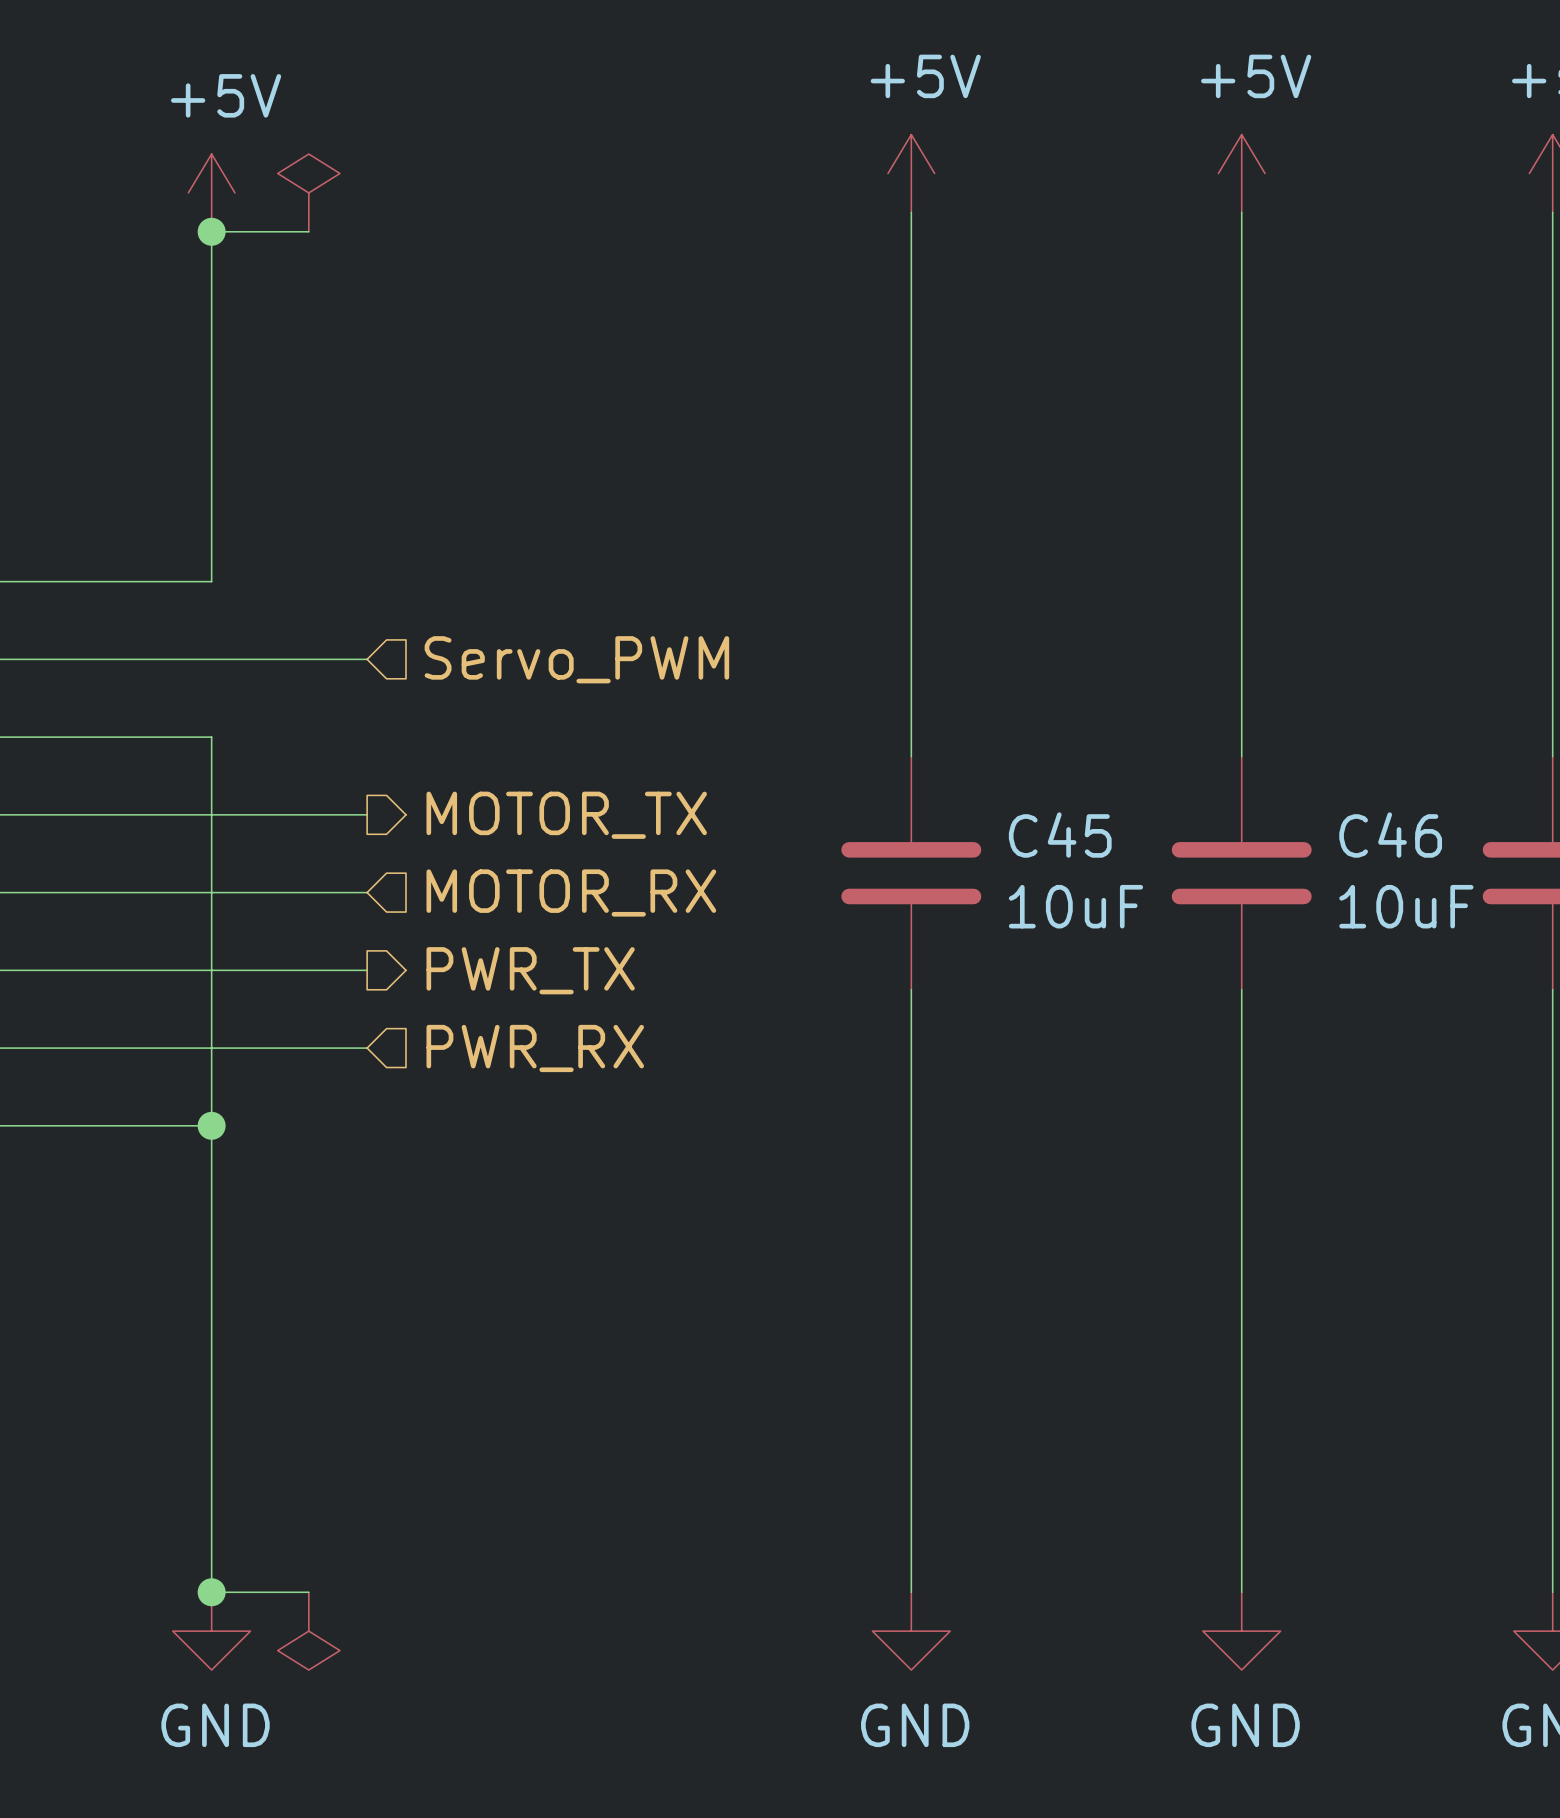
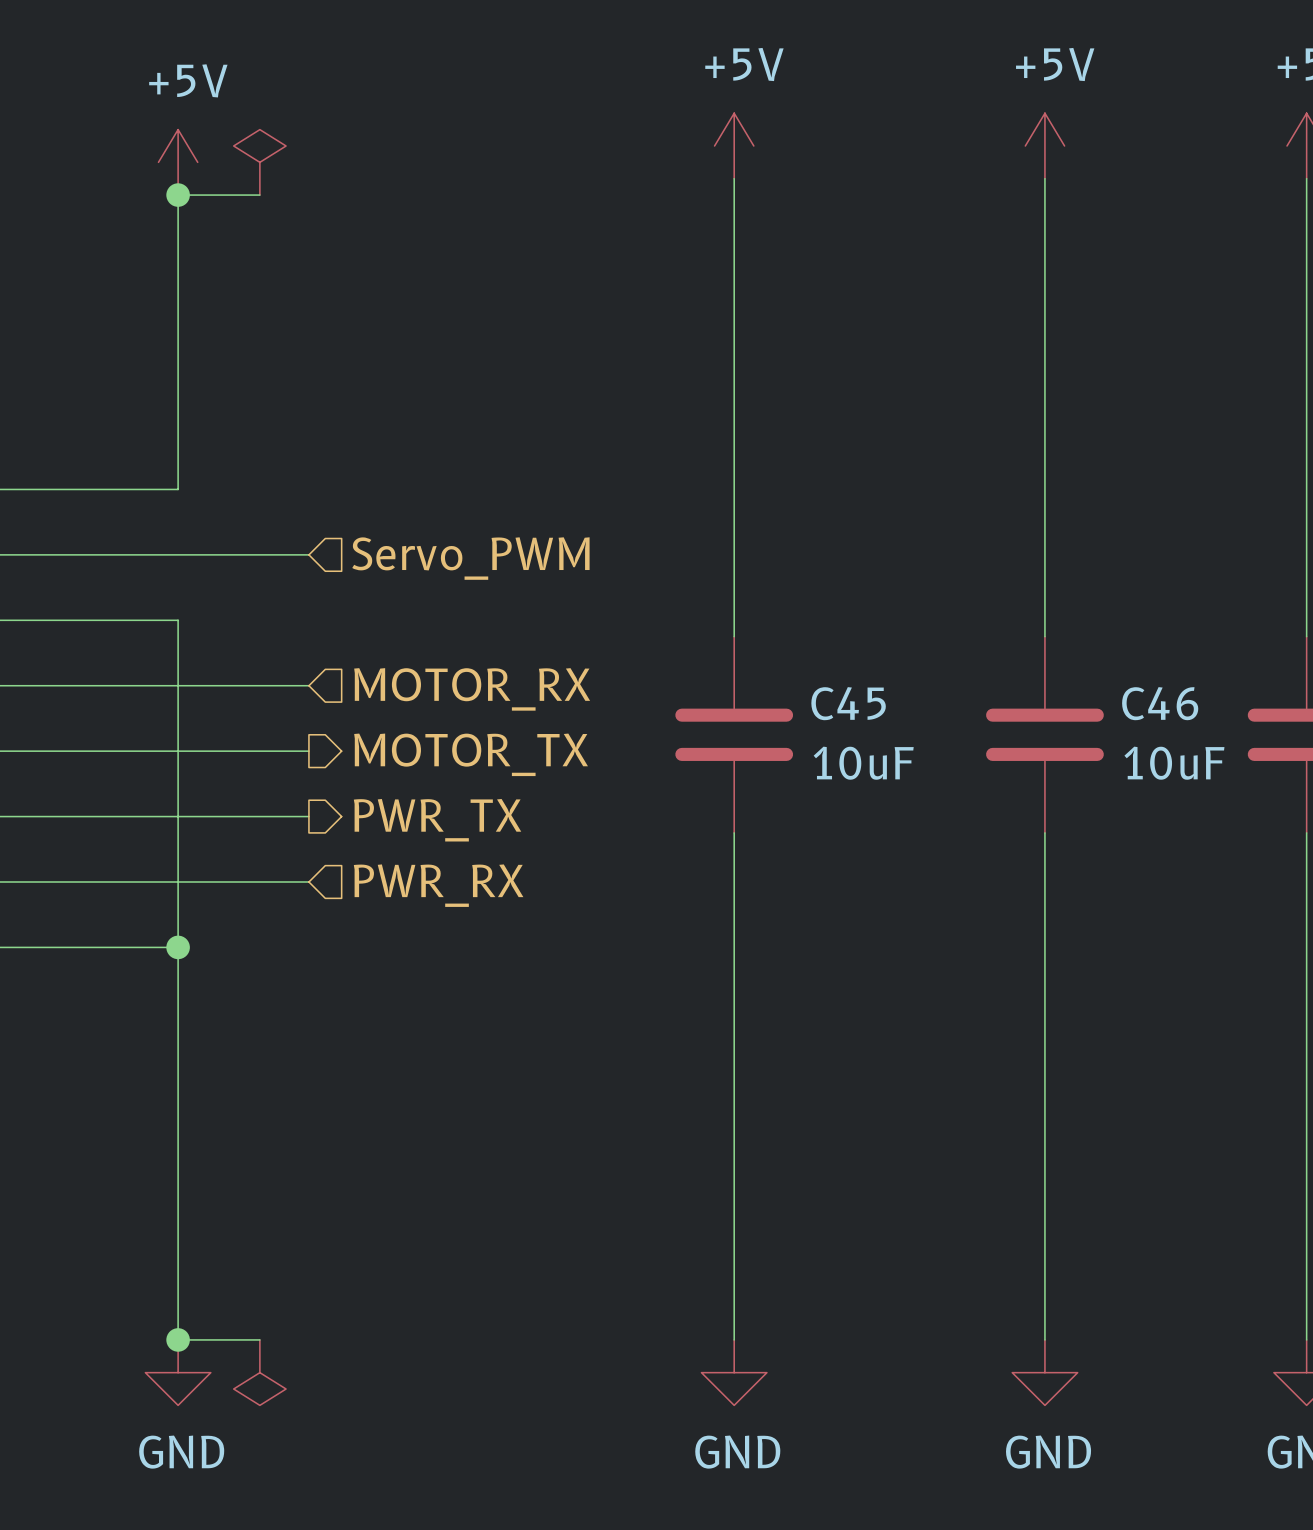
power symbol position: +5V (911, 173) -> +5V (734, 145)
wire: (911, 212) (911, 756) -> (734, 178) (734, 636)
hierarchical label shape: output (566, 815) -> input (472, 689)
hierarchical label: MOTOR_TX (566, 815) -> MOTOR_RX (472, 689)
C45 position: (911, 873) -> (734, 734)
hierarchical label shape: input (571, 892) -> output (471, 754)
hierarchical label: MOTOR_RX (571, 892) -> MOTOR_TX (471, 754)
wire: (911, 989) (911, 1592) -> (734, 832) (734, 1339)
power symbol position: GND (911, 1631) -> GND (734, 1372)

